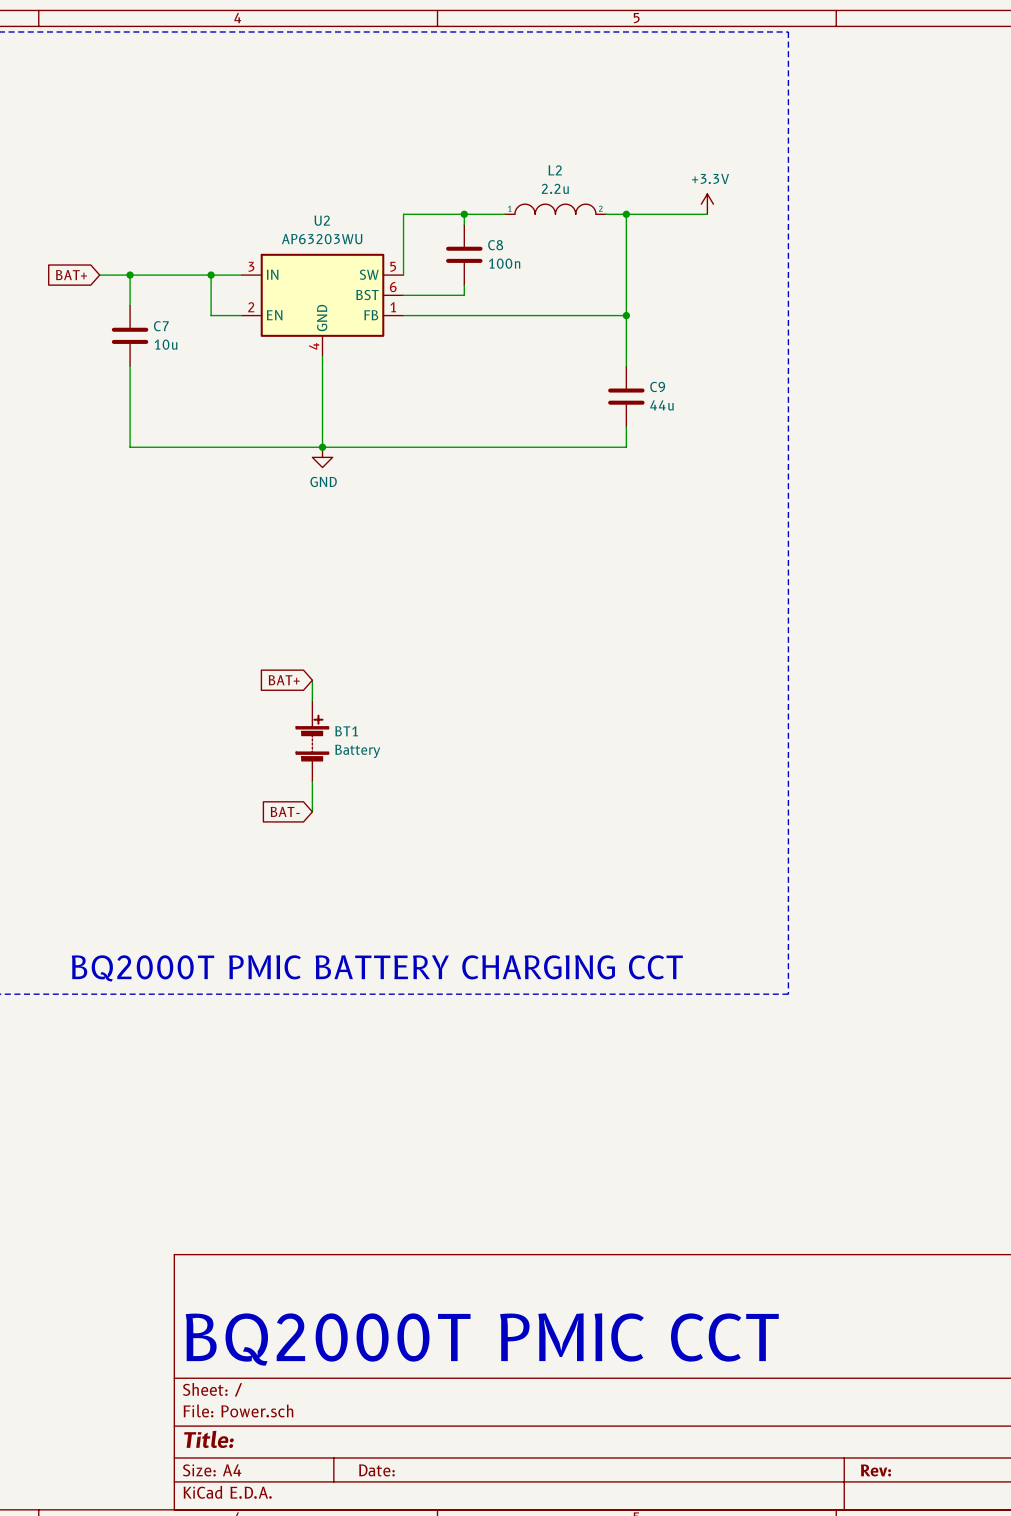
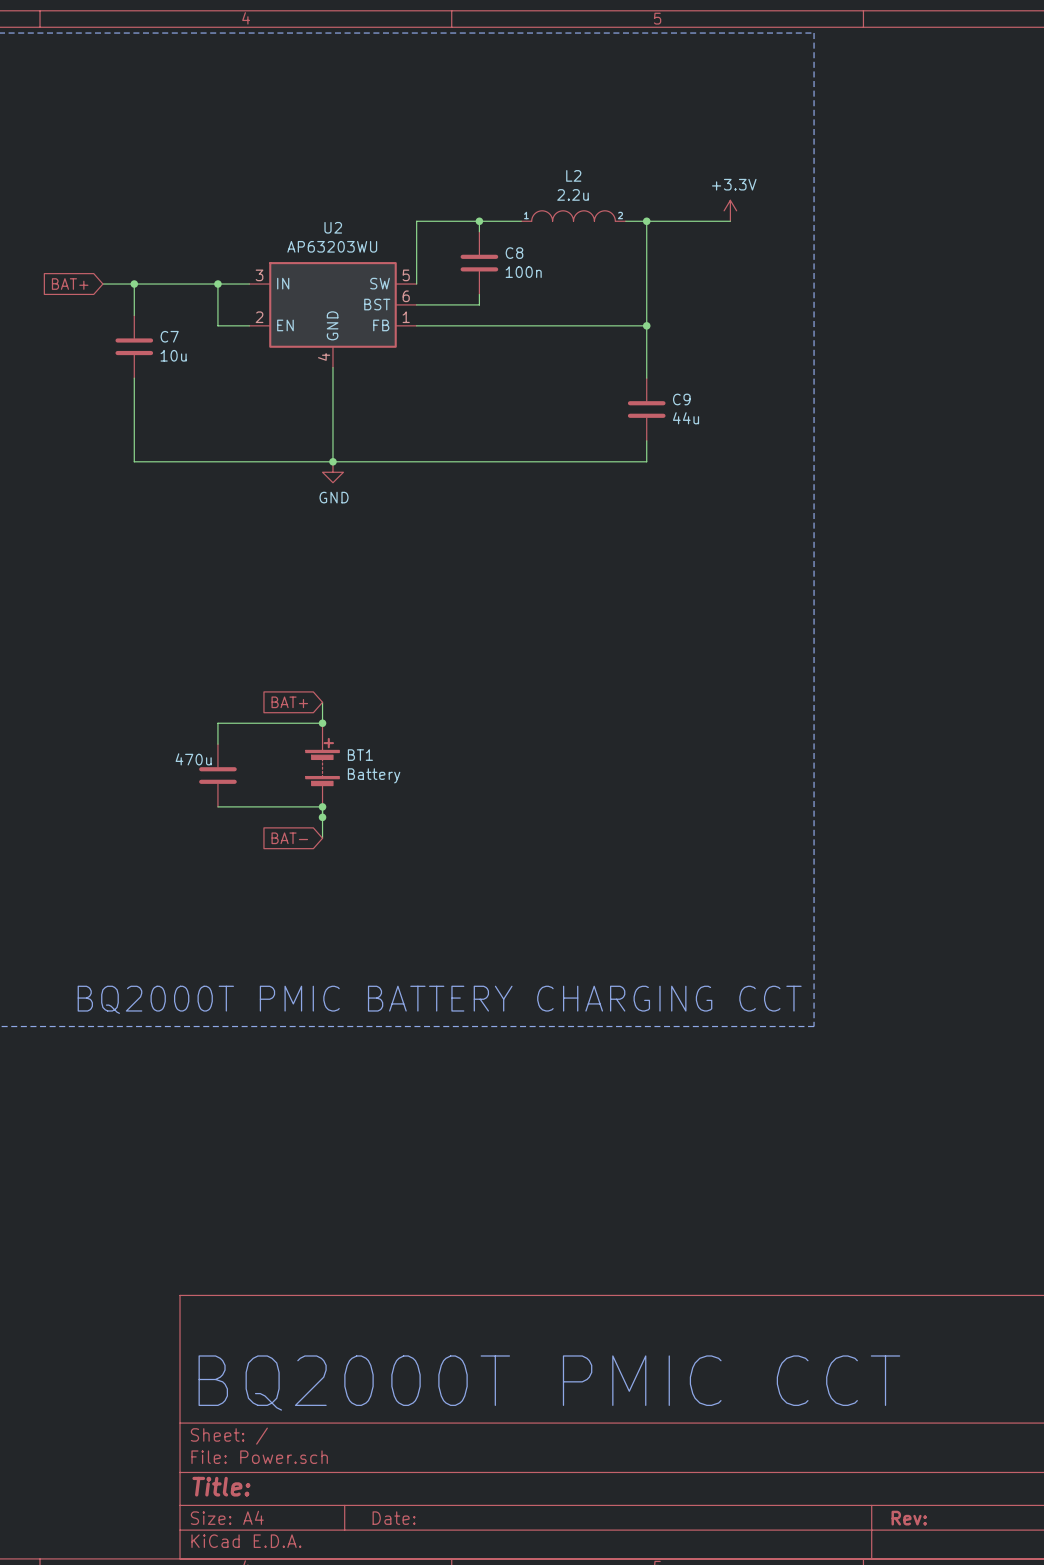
wire: none -> (322, 723) (217, 723) (217, 744)
junction: none -> (322, 723)
part: none -> 470u (217, 775)
wire: none -> (217, 806) (322, 806)
junction: none -> (322, 806)
junction: none -> (322, 817)

